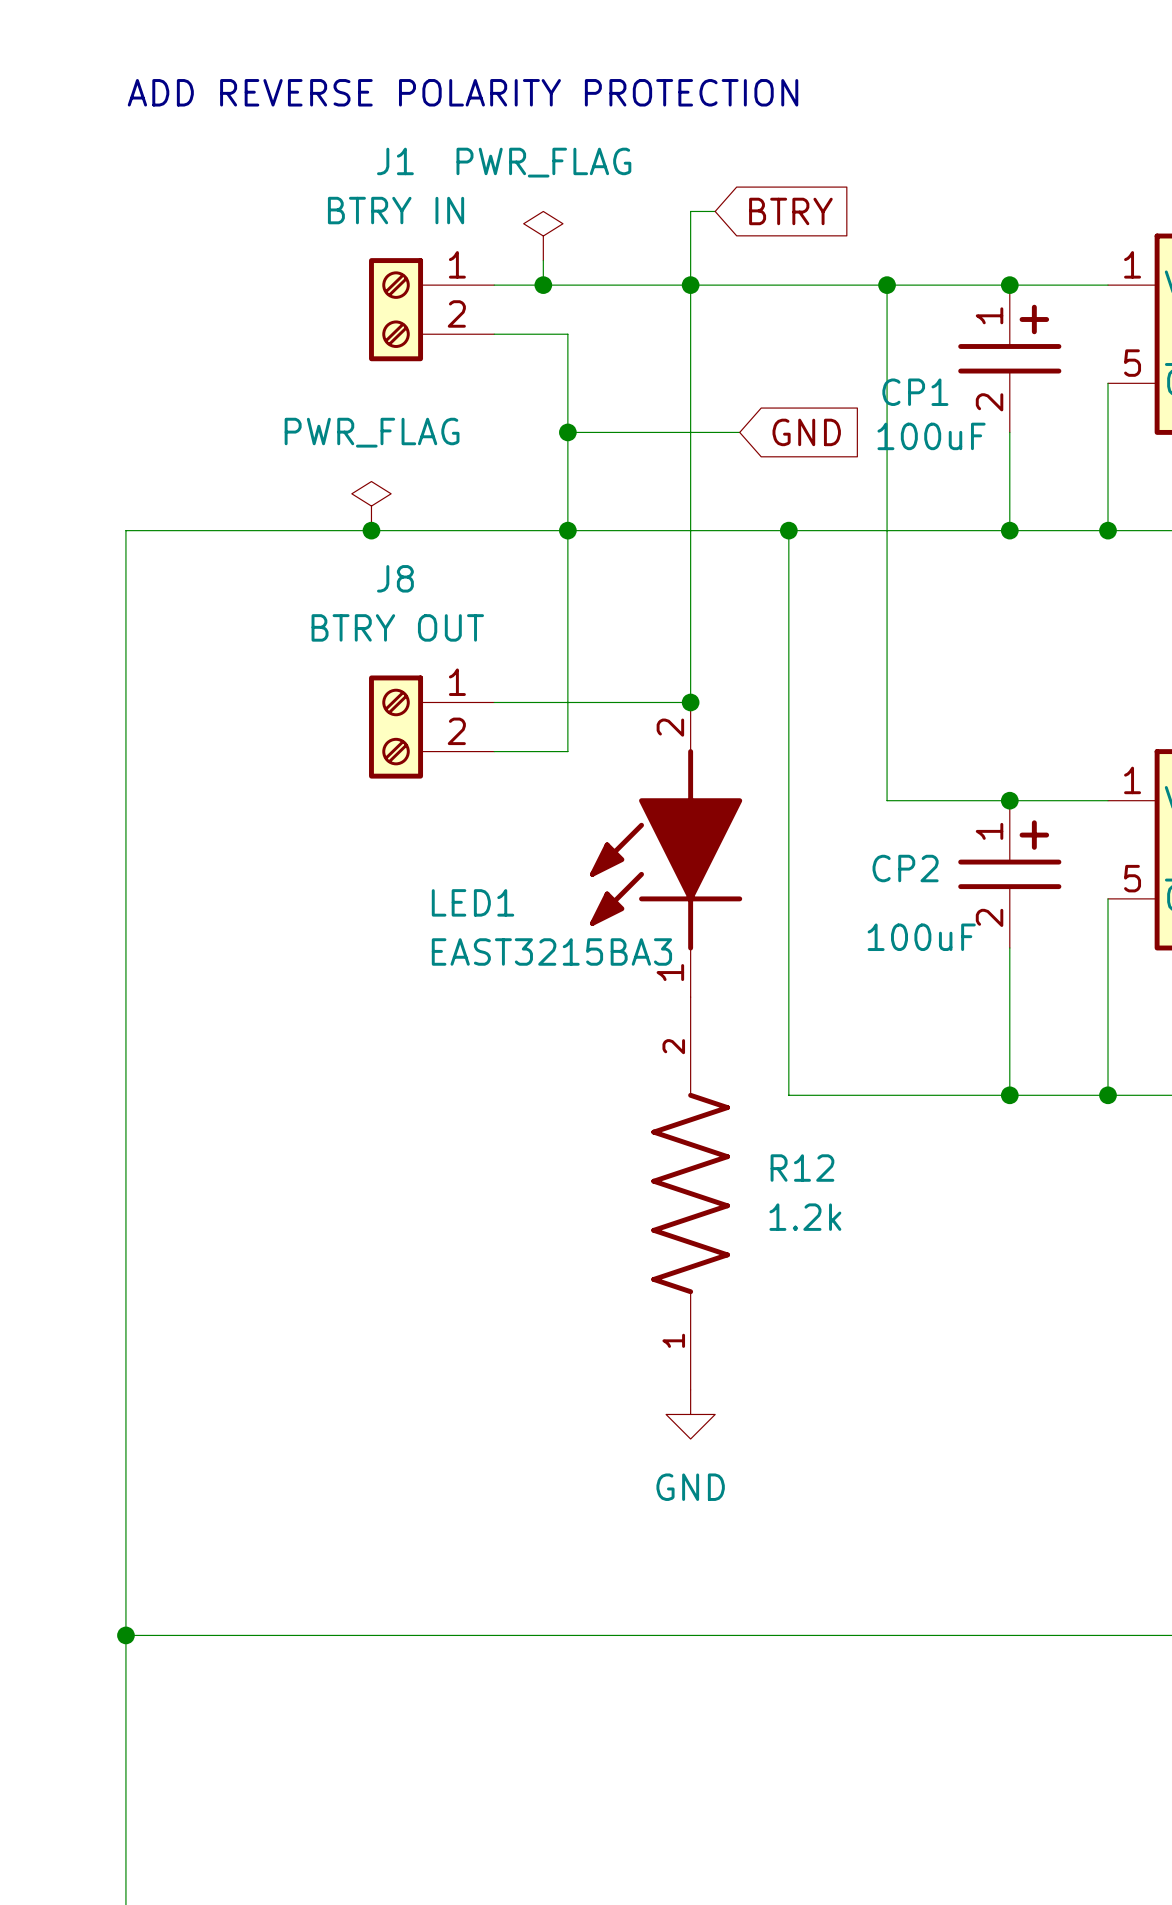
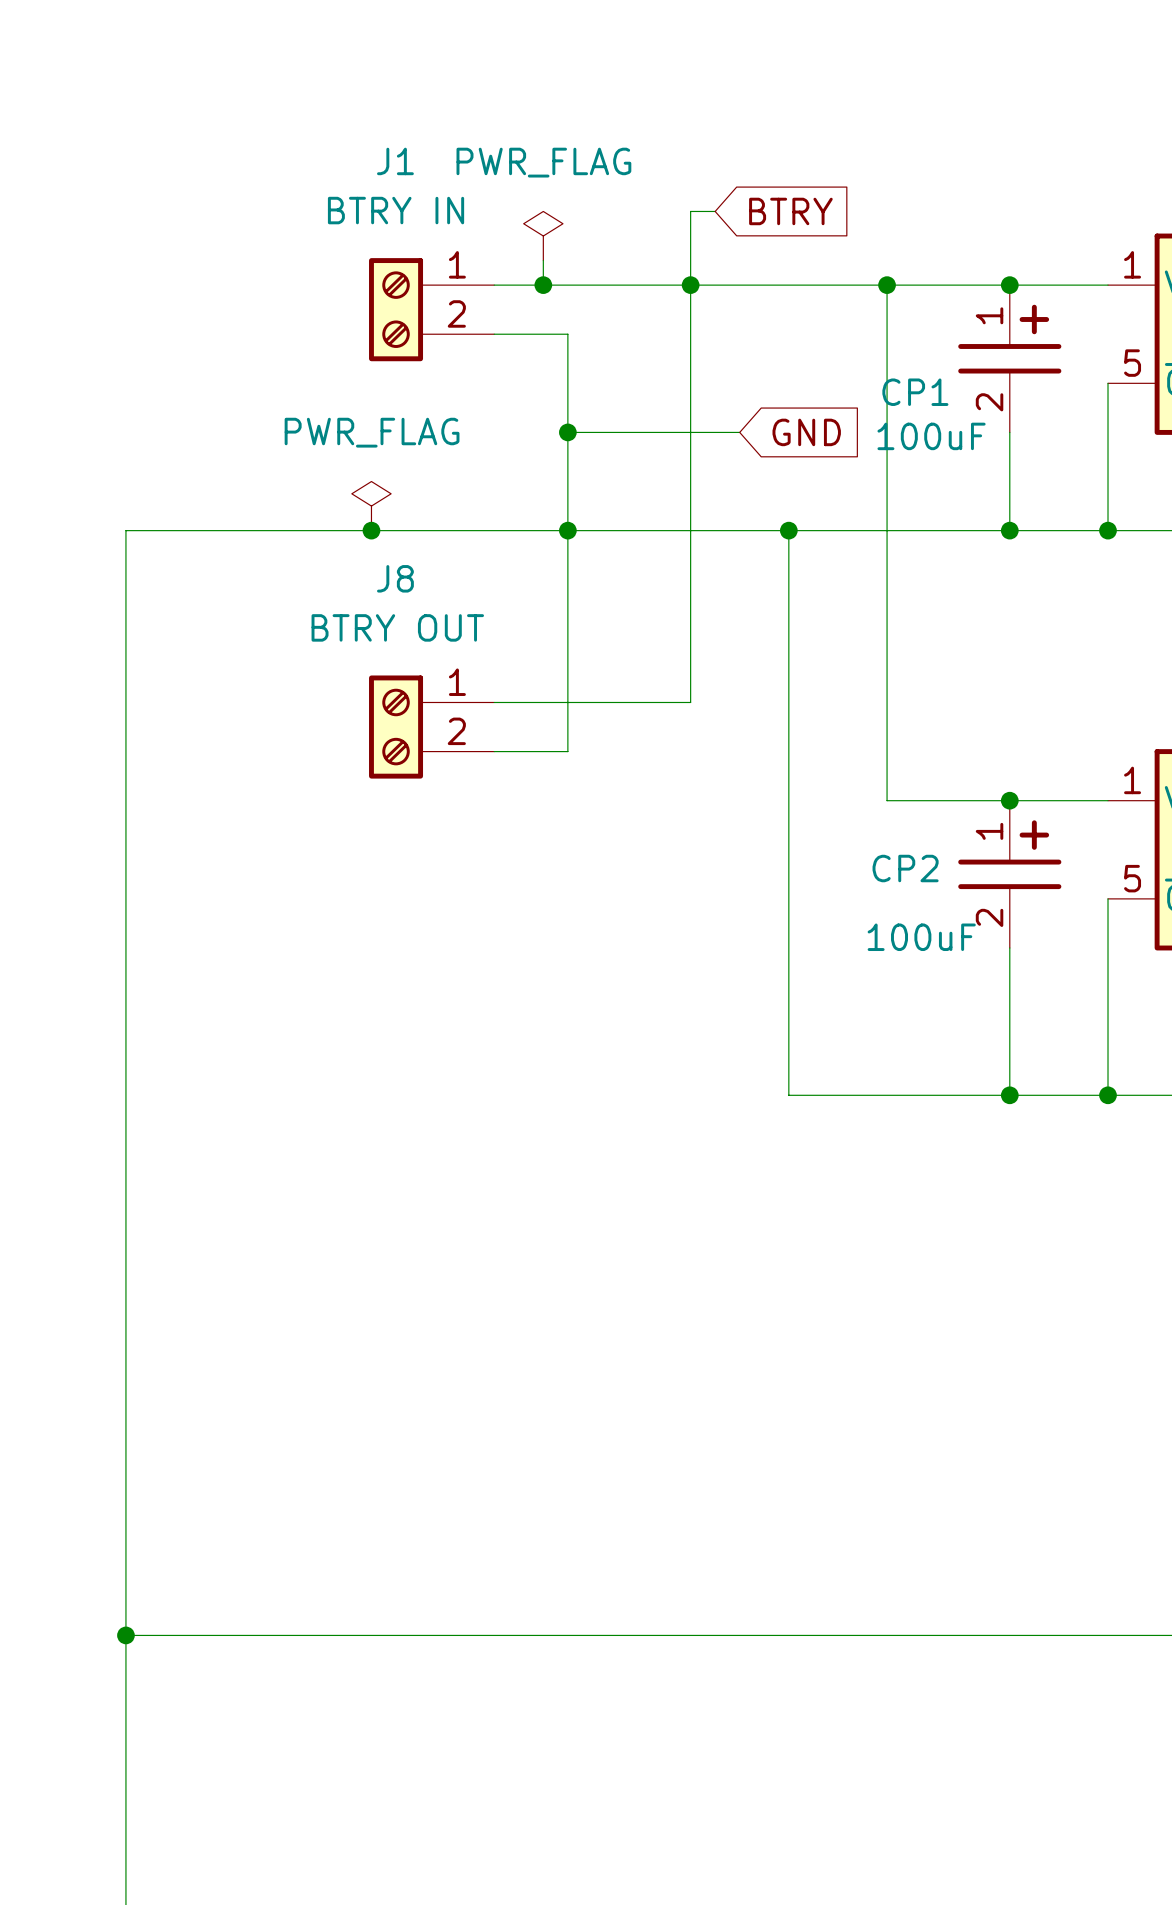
text: ADD REVERSE POLARITY PROTECTION (463, 92) -> none
junction: (690, 702) -> none
LED1: EAST3215BA3 (666, 849) -> none
R12: 1.2k (690, 1193) -> none
power symbol: GND (690, 1414) -> none

